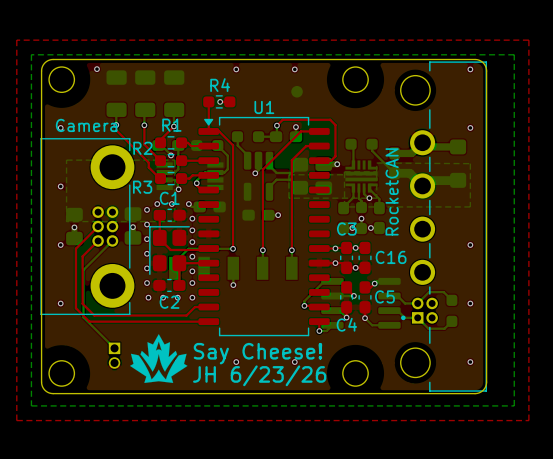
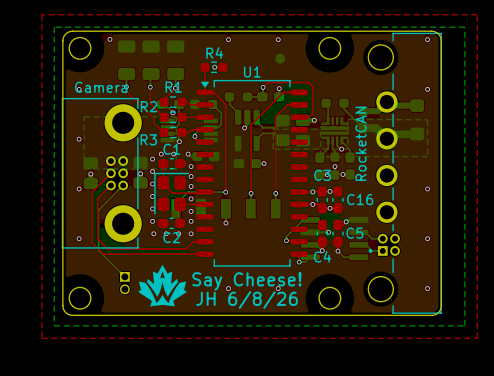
bottom track: (451, 300) (443, 292) (429, 292) (417, 303) -> none
part: (451, 310) -> none
bottom track: (417, 317) (428, 328) (444, 328) (451, 321) -> none
text: JH 6/23/26 (259, 375) -> JH 6/8/26 (247, 299)

